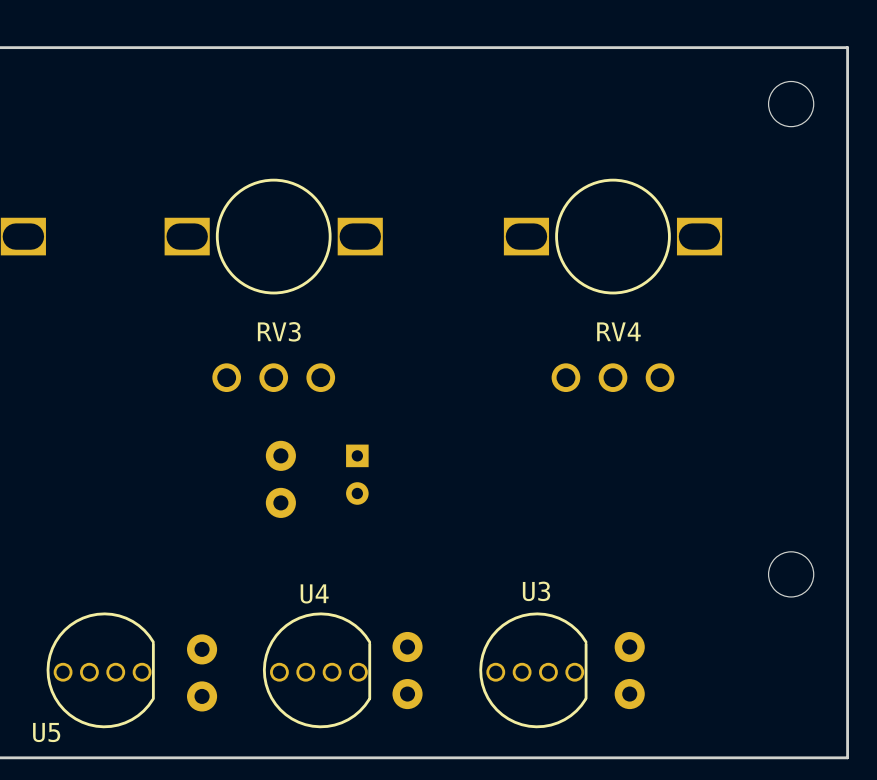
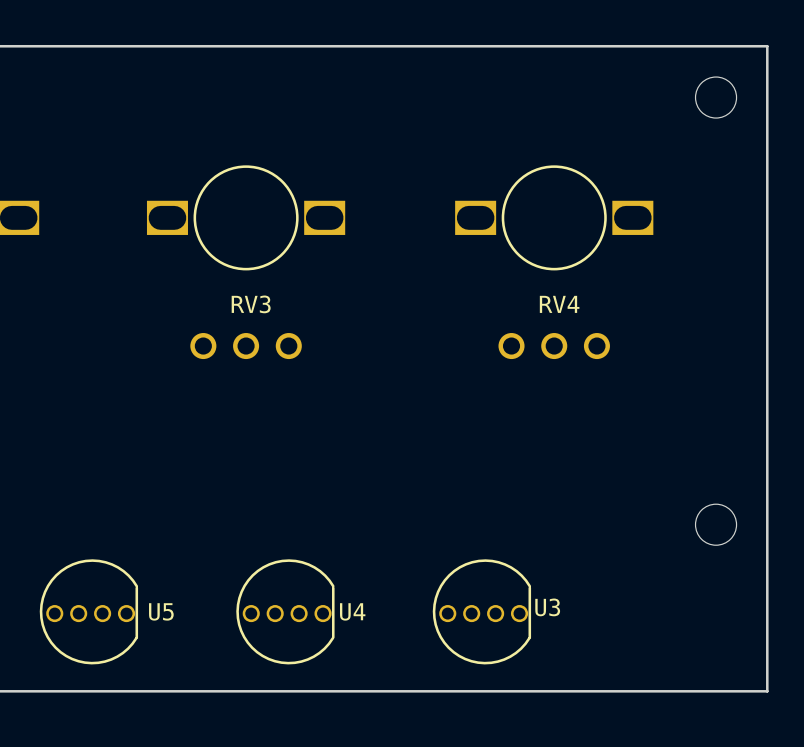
part: (357, 474) -> none
part: (280, 479) -> none
U3 name position: U3 (536, 591) -> U3 (547, 607)
U4 name position: U4 (314, 593) -> U4 (352, 611)
part: (407, 670) -> none
part: (629, 670) -> none
part: (202, 672) -> none
U5 name position: U5 (46, 732) -> U5 (161, 611)

